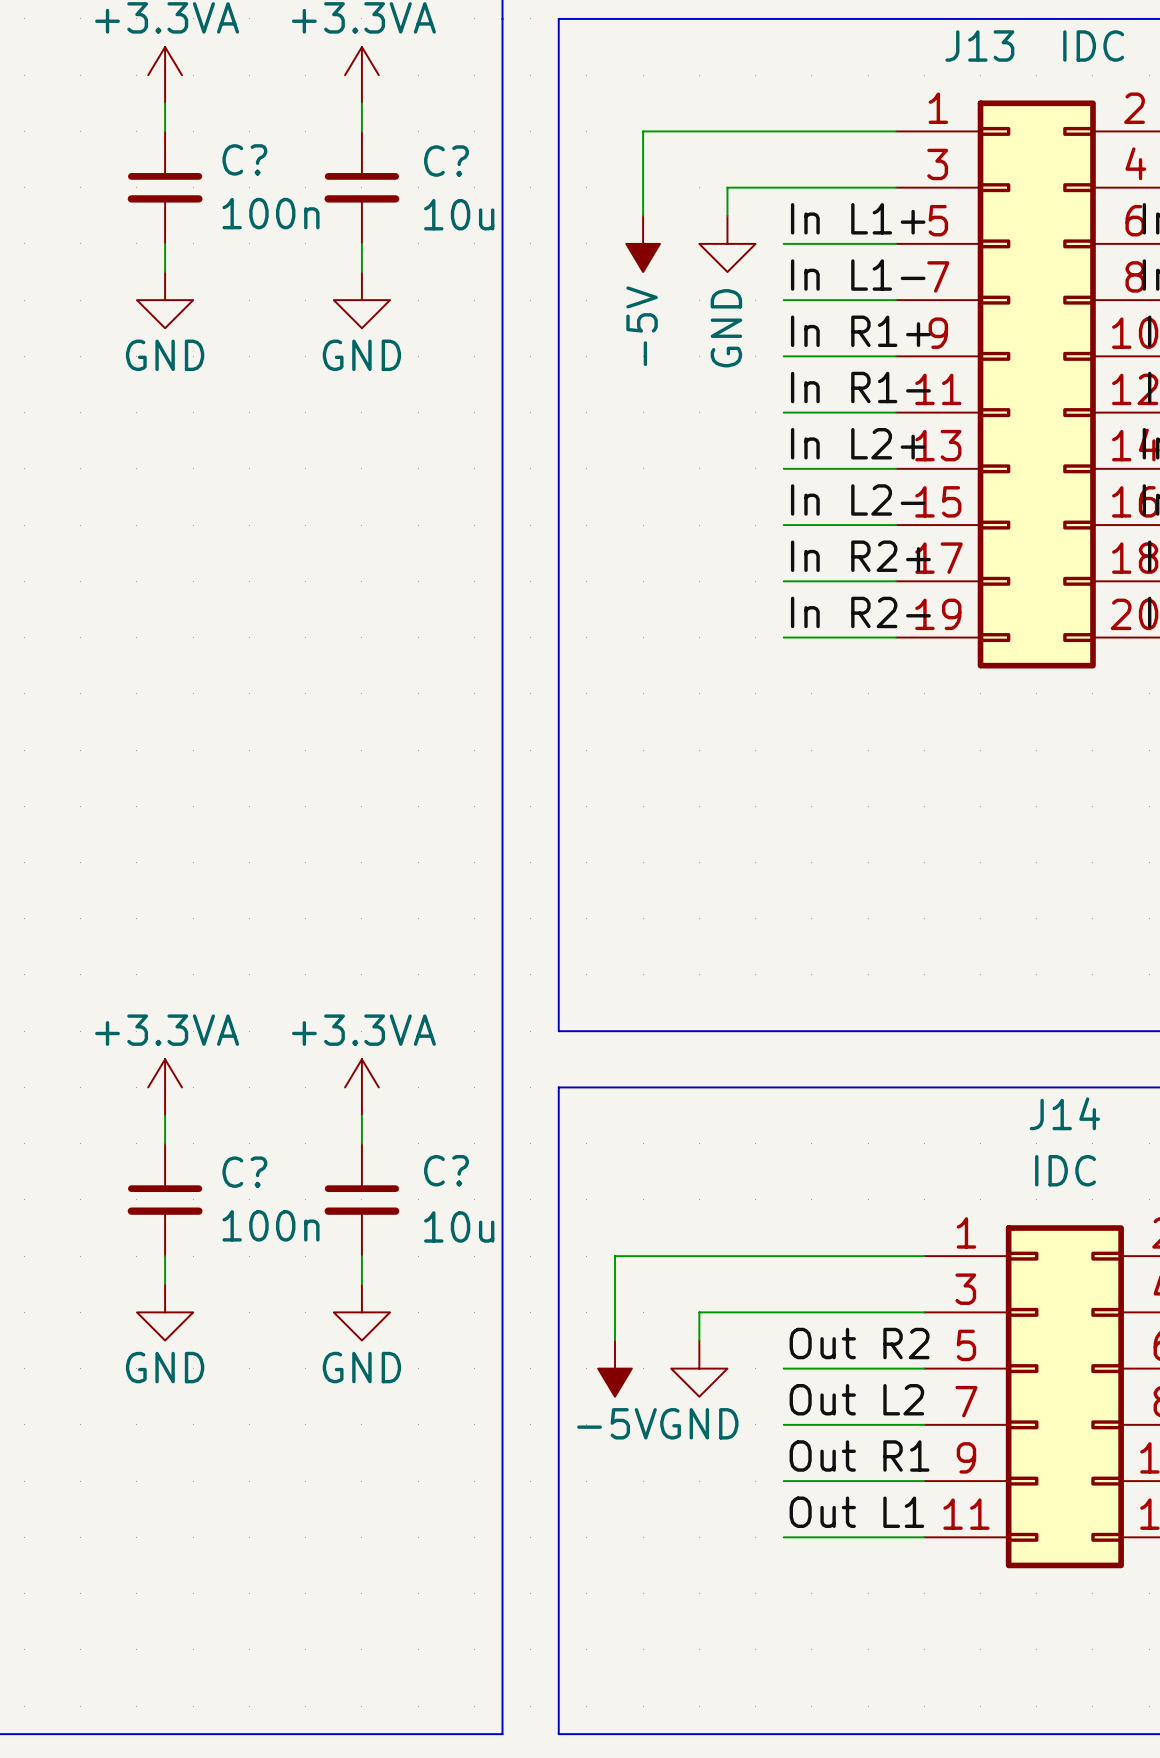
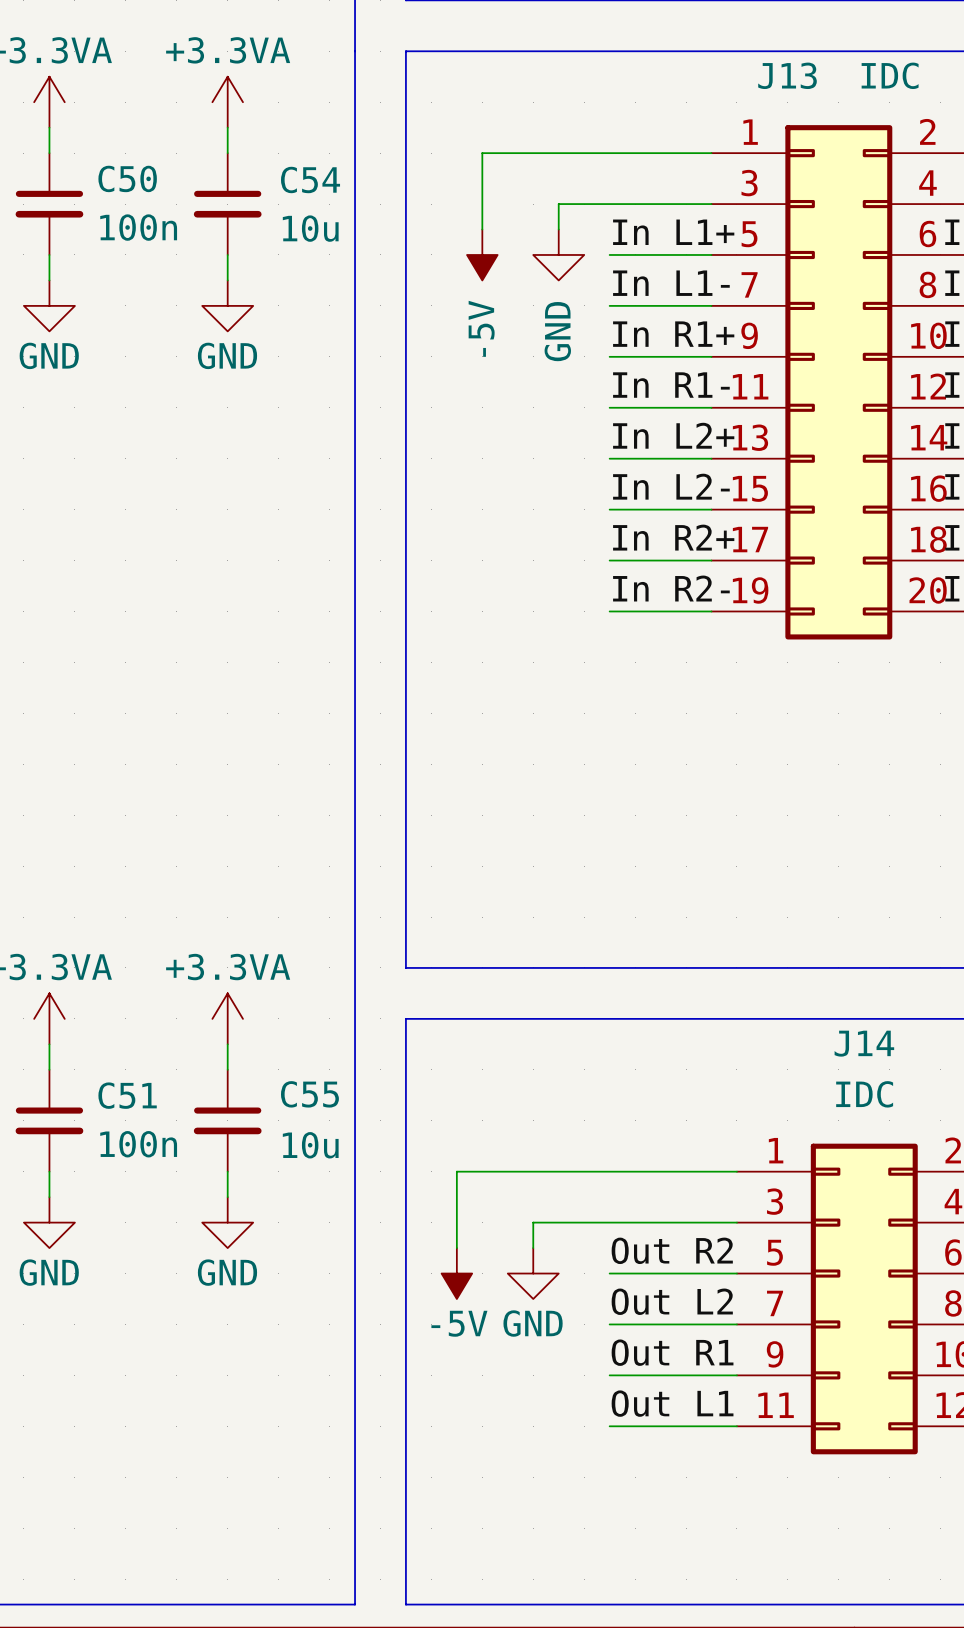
C? name: C? (244, 159) -> C50 (127, 178)
C? name: C? (446, 161) -> C54 (310, 179)
C? name: C? (446, 1170) -> C55 (309, 1094)
C? name: C? (244, 1172) -> C51 (127, 1095)

